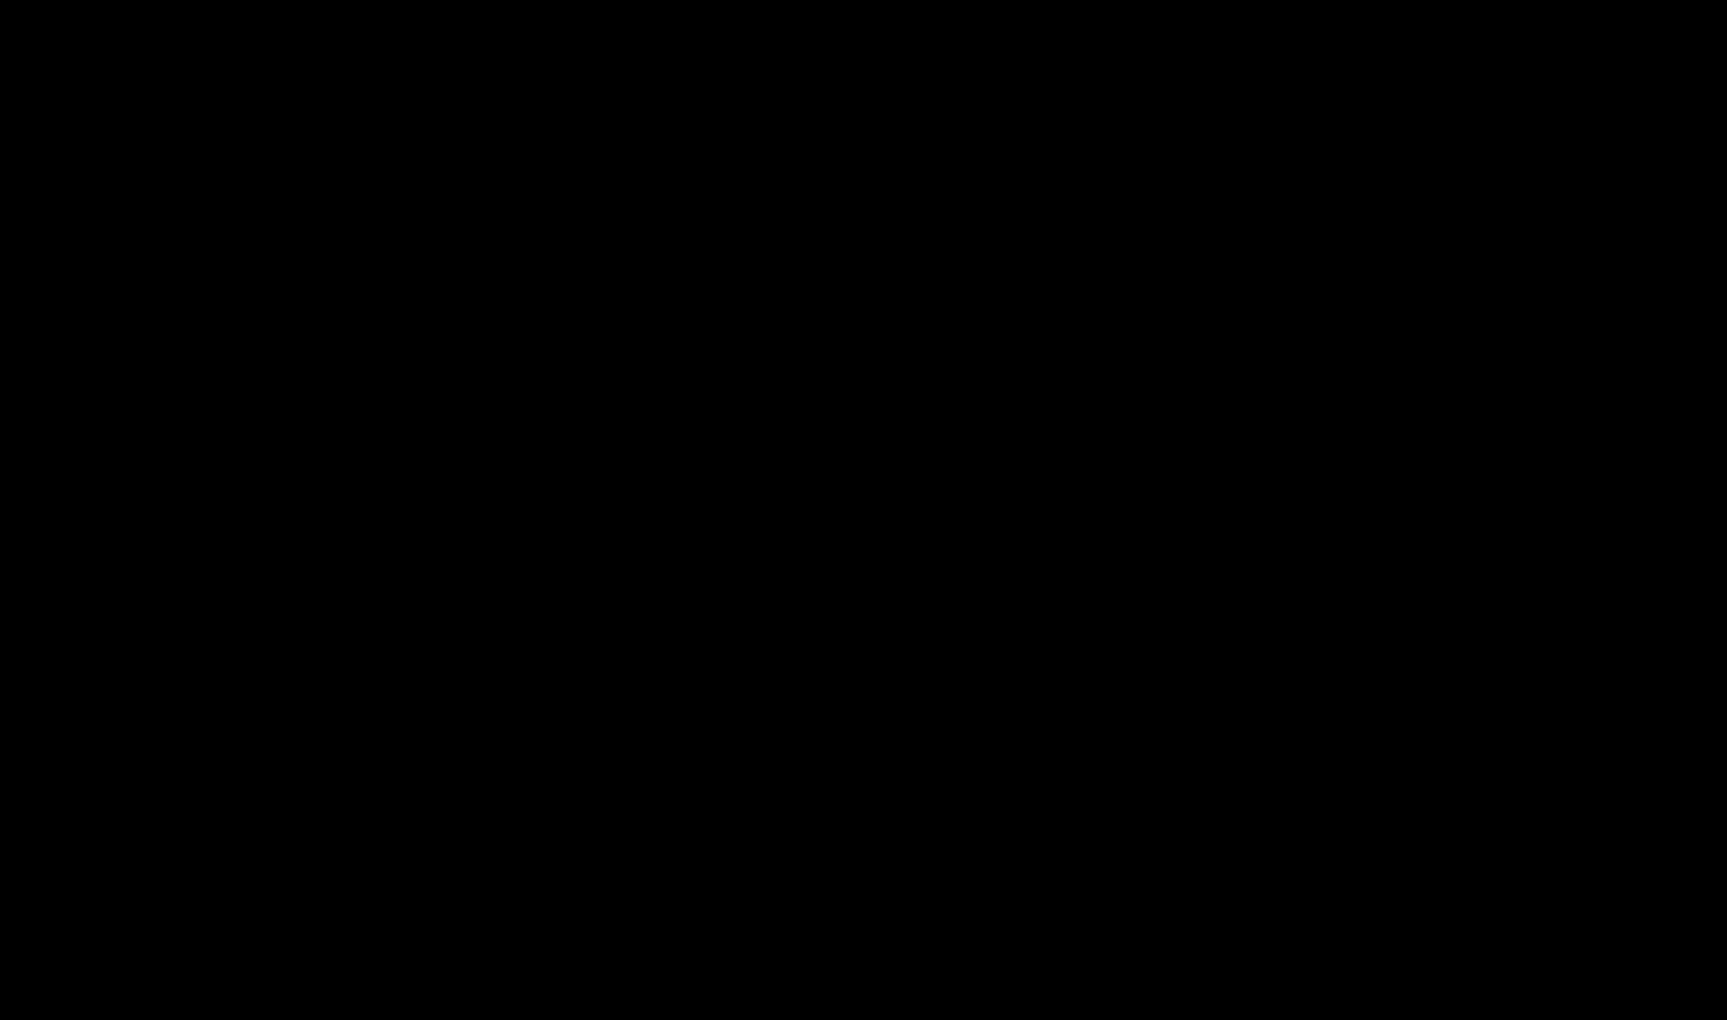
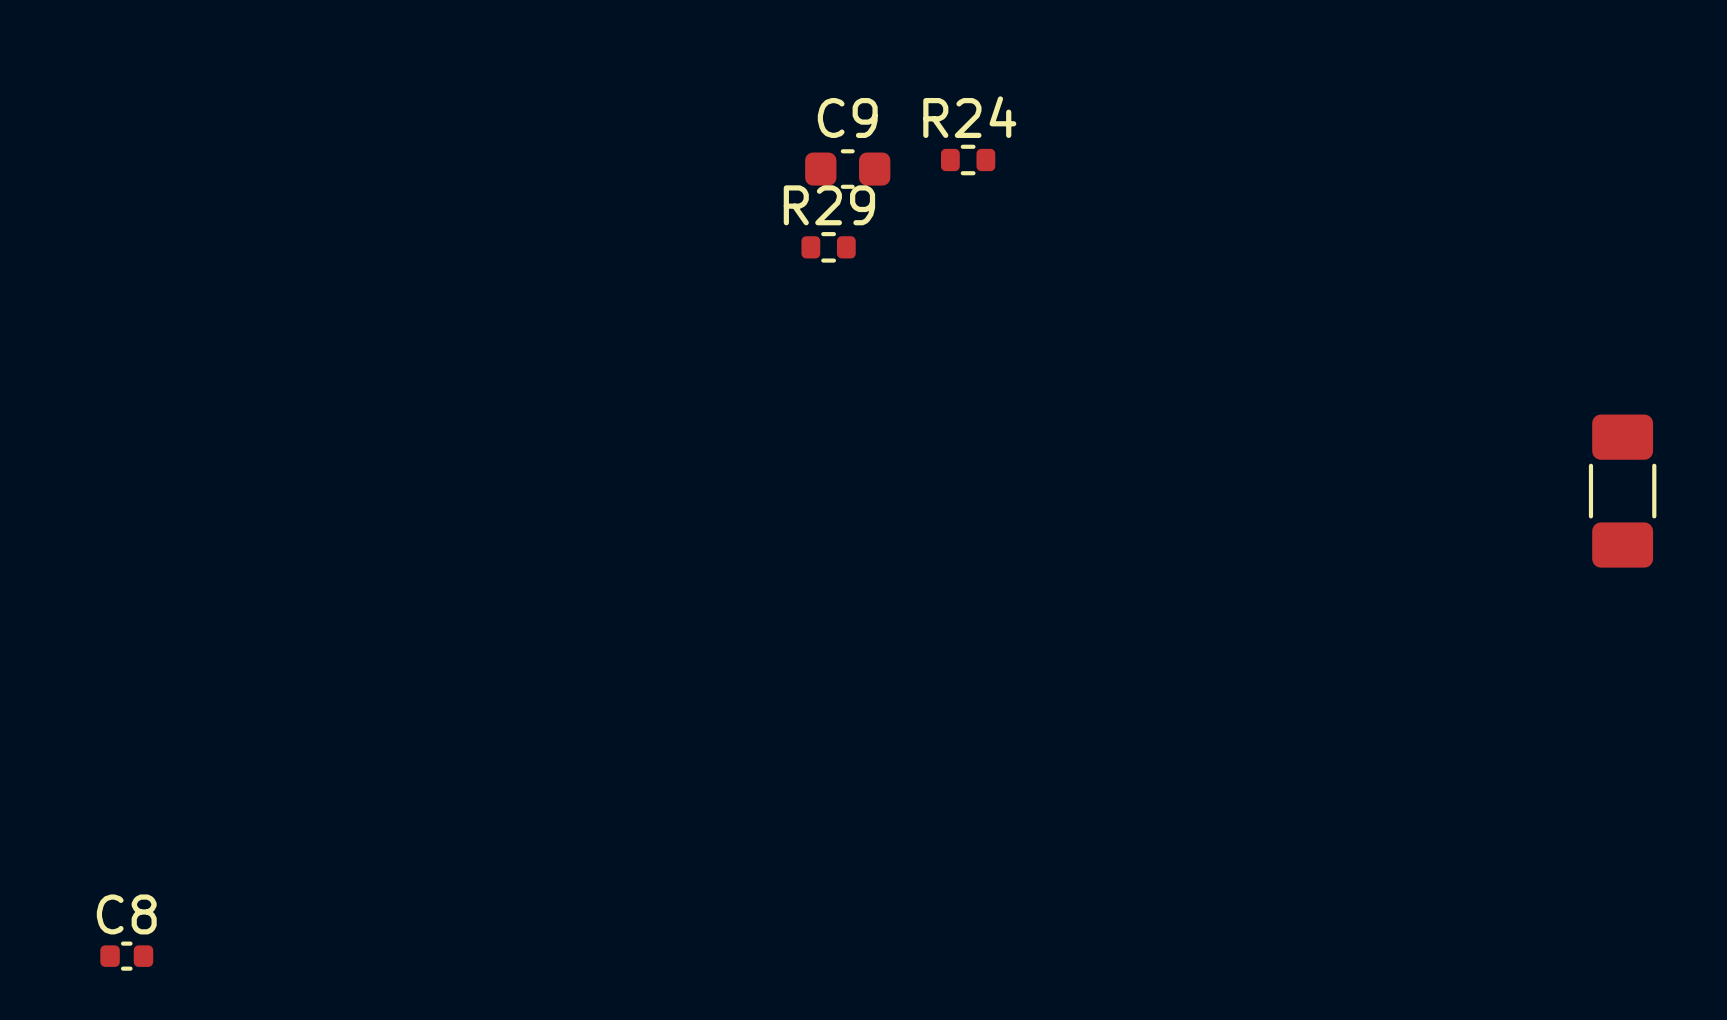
R24: none -> (968, 160)
C9: none -> (847, 169)
R29: none -> (828, 247)
part: none -> (1622, 491)
C8: none -> (126, 956)

